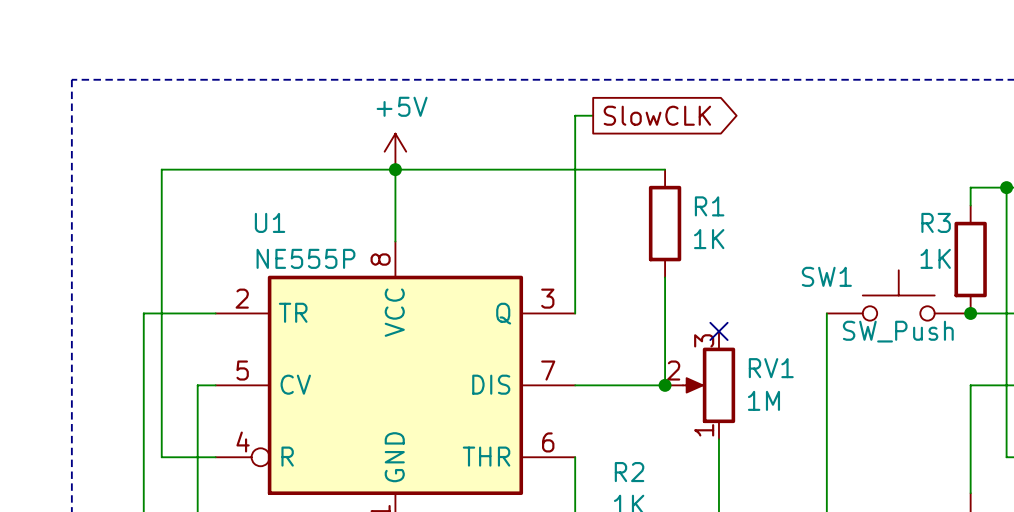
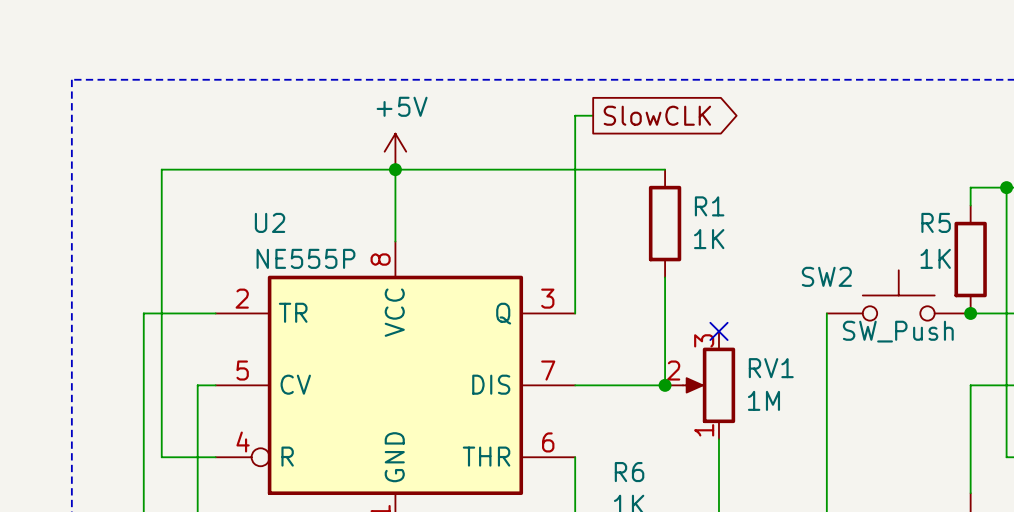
U1 name: U1 (270, 222) -> U2 (270, 222)
R3 name: R3 (936, 222) -> R5 (936, 222)
SW1 name: SW1 (826, 276) -> SW2 (826, 276)
R2 name: R2 (629, 472) -> R6 (629, 472)

